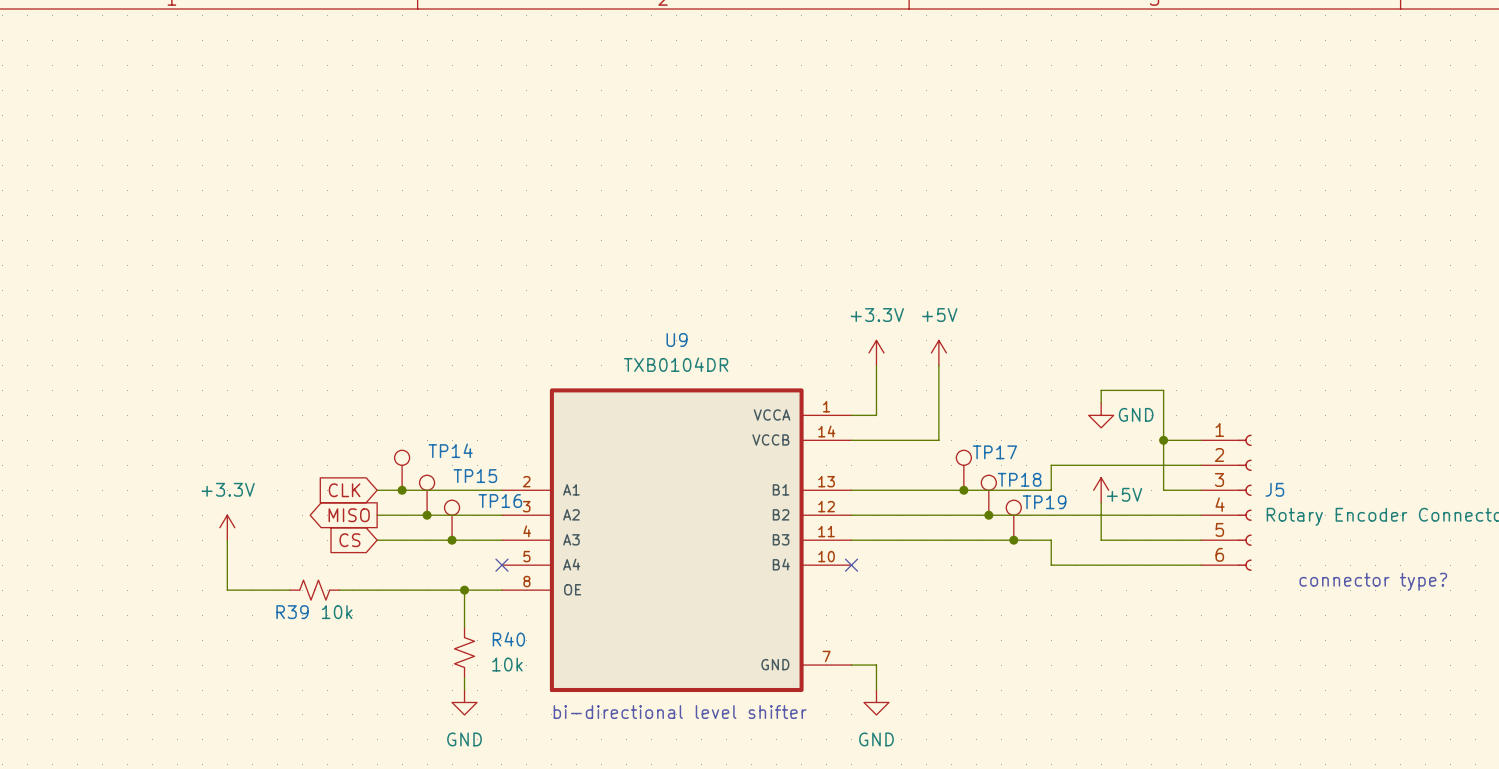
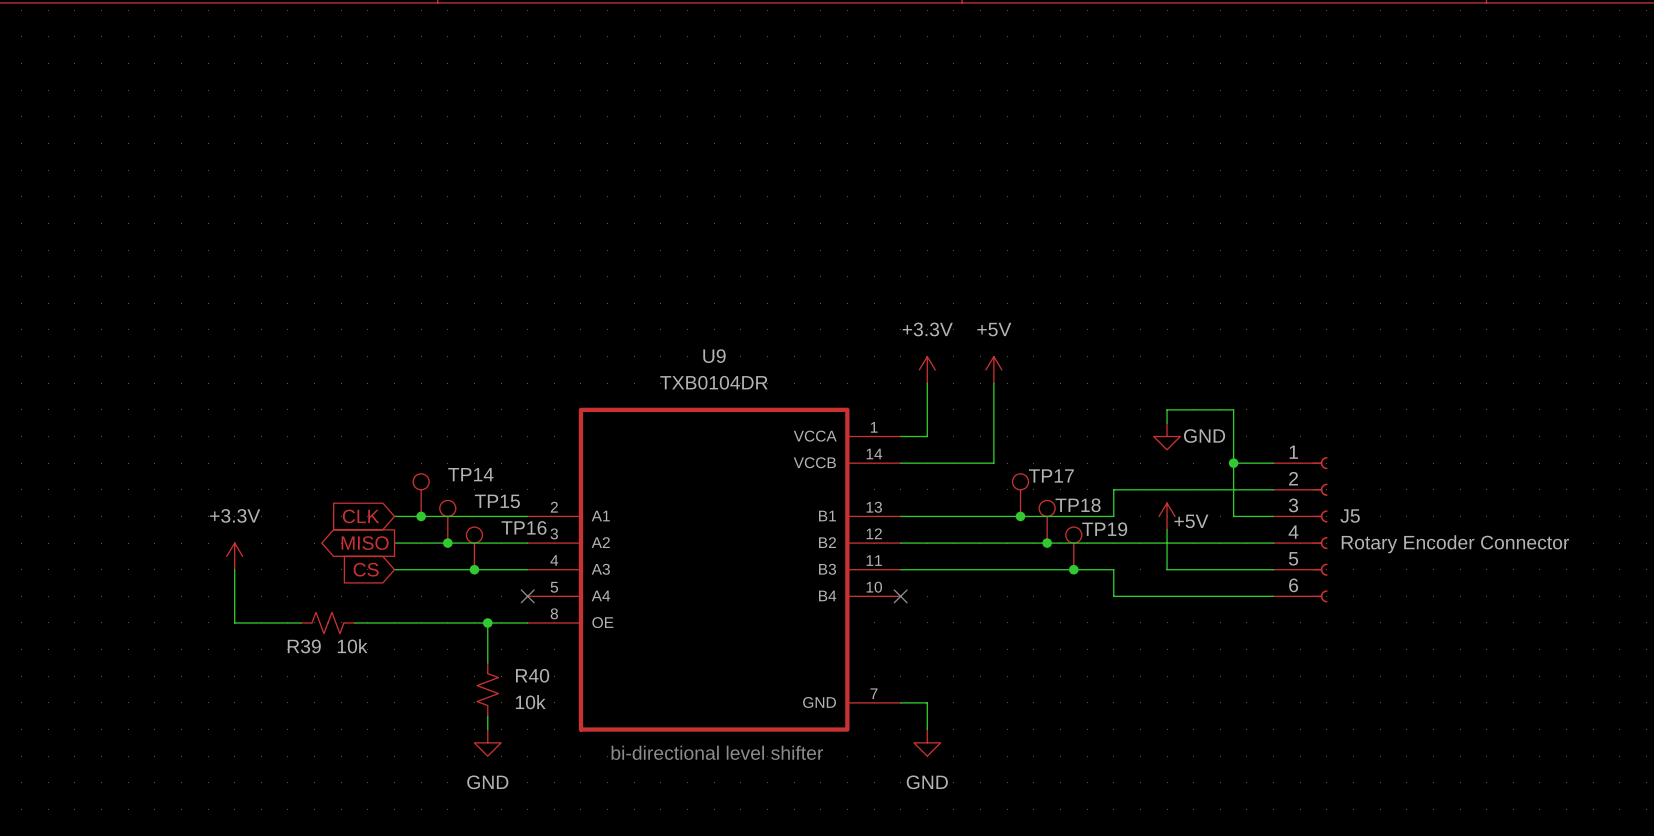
text: connector type? (1373, 581) -> none

